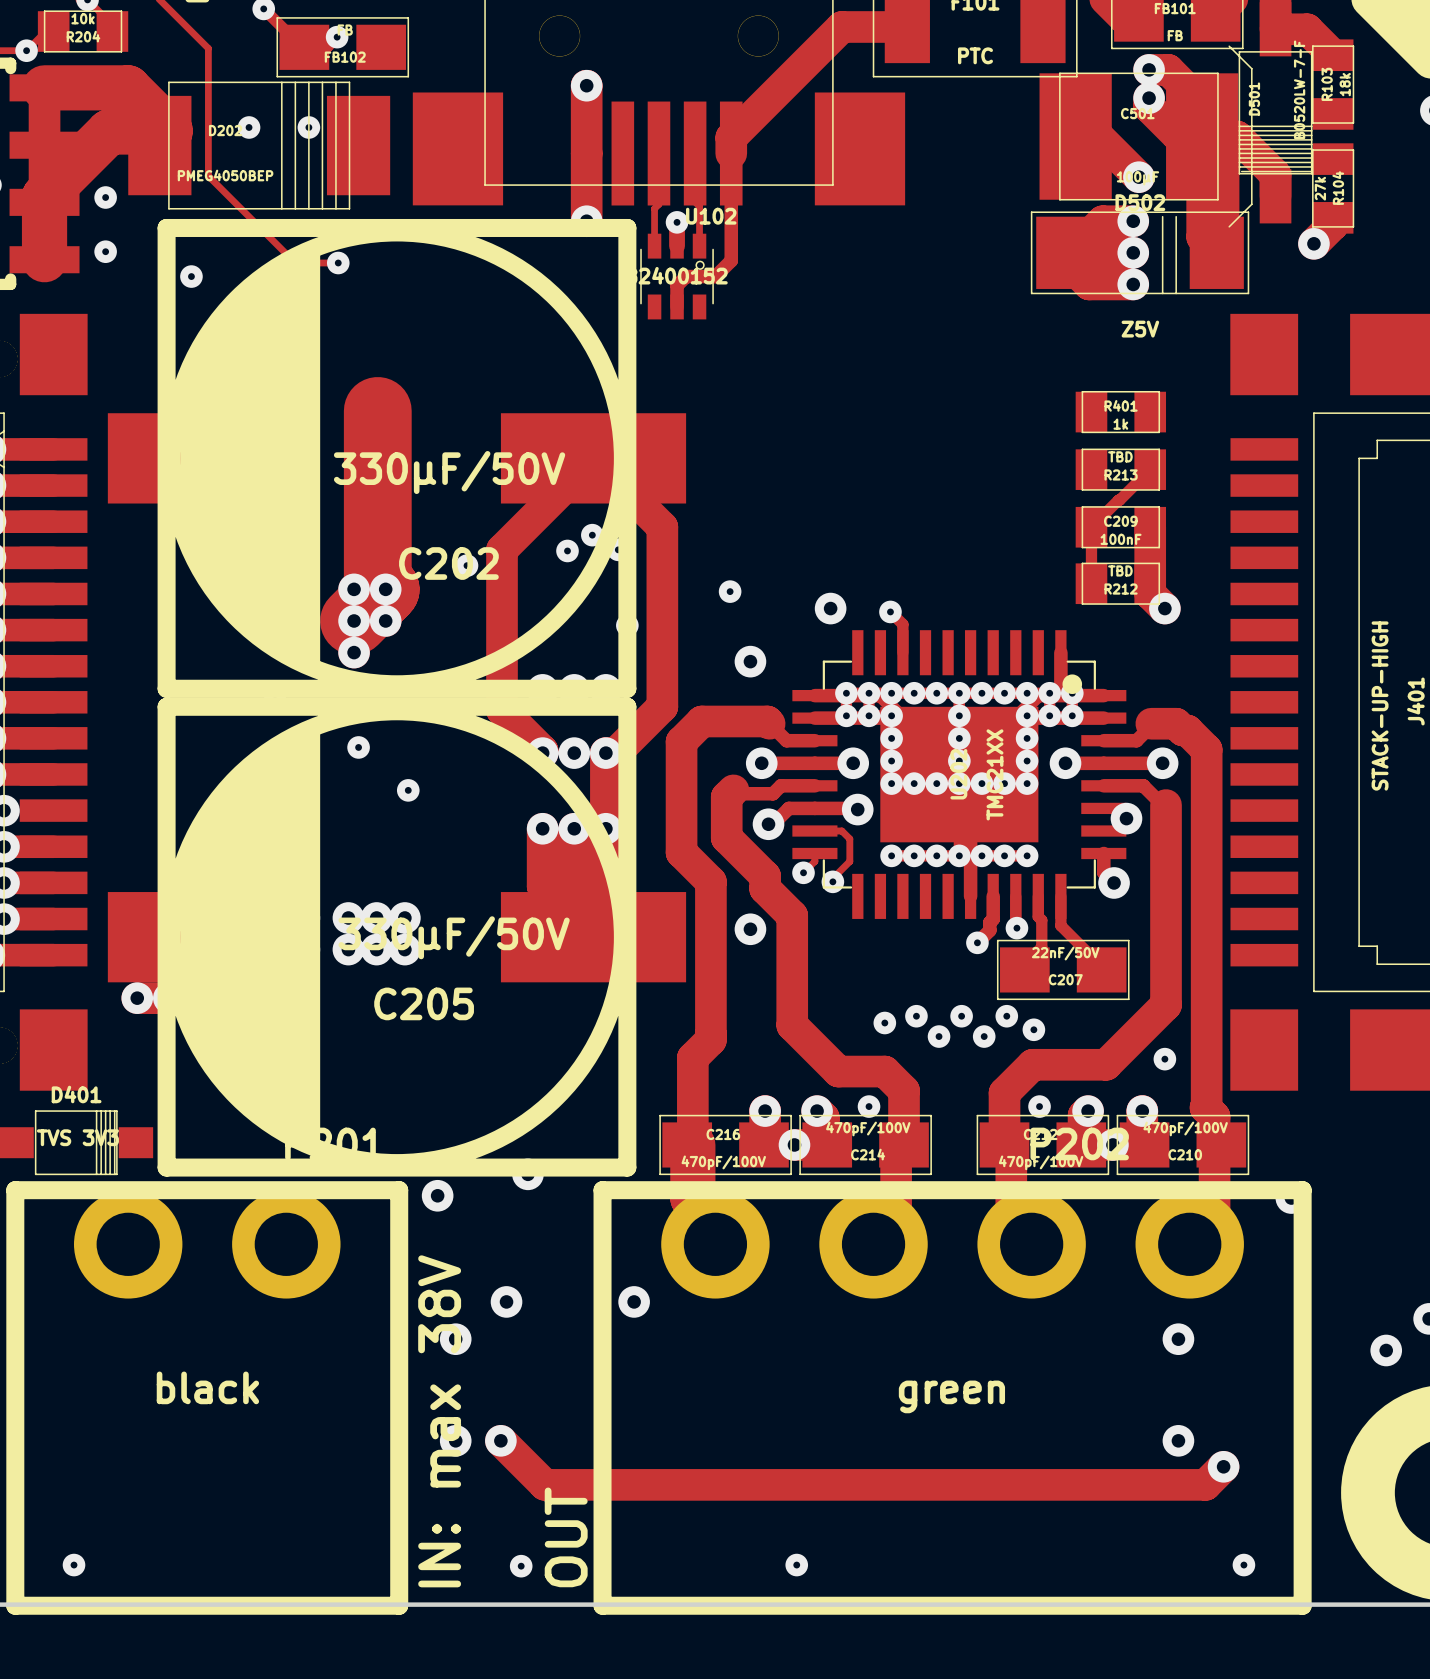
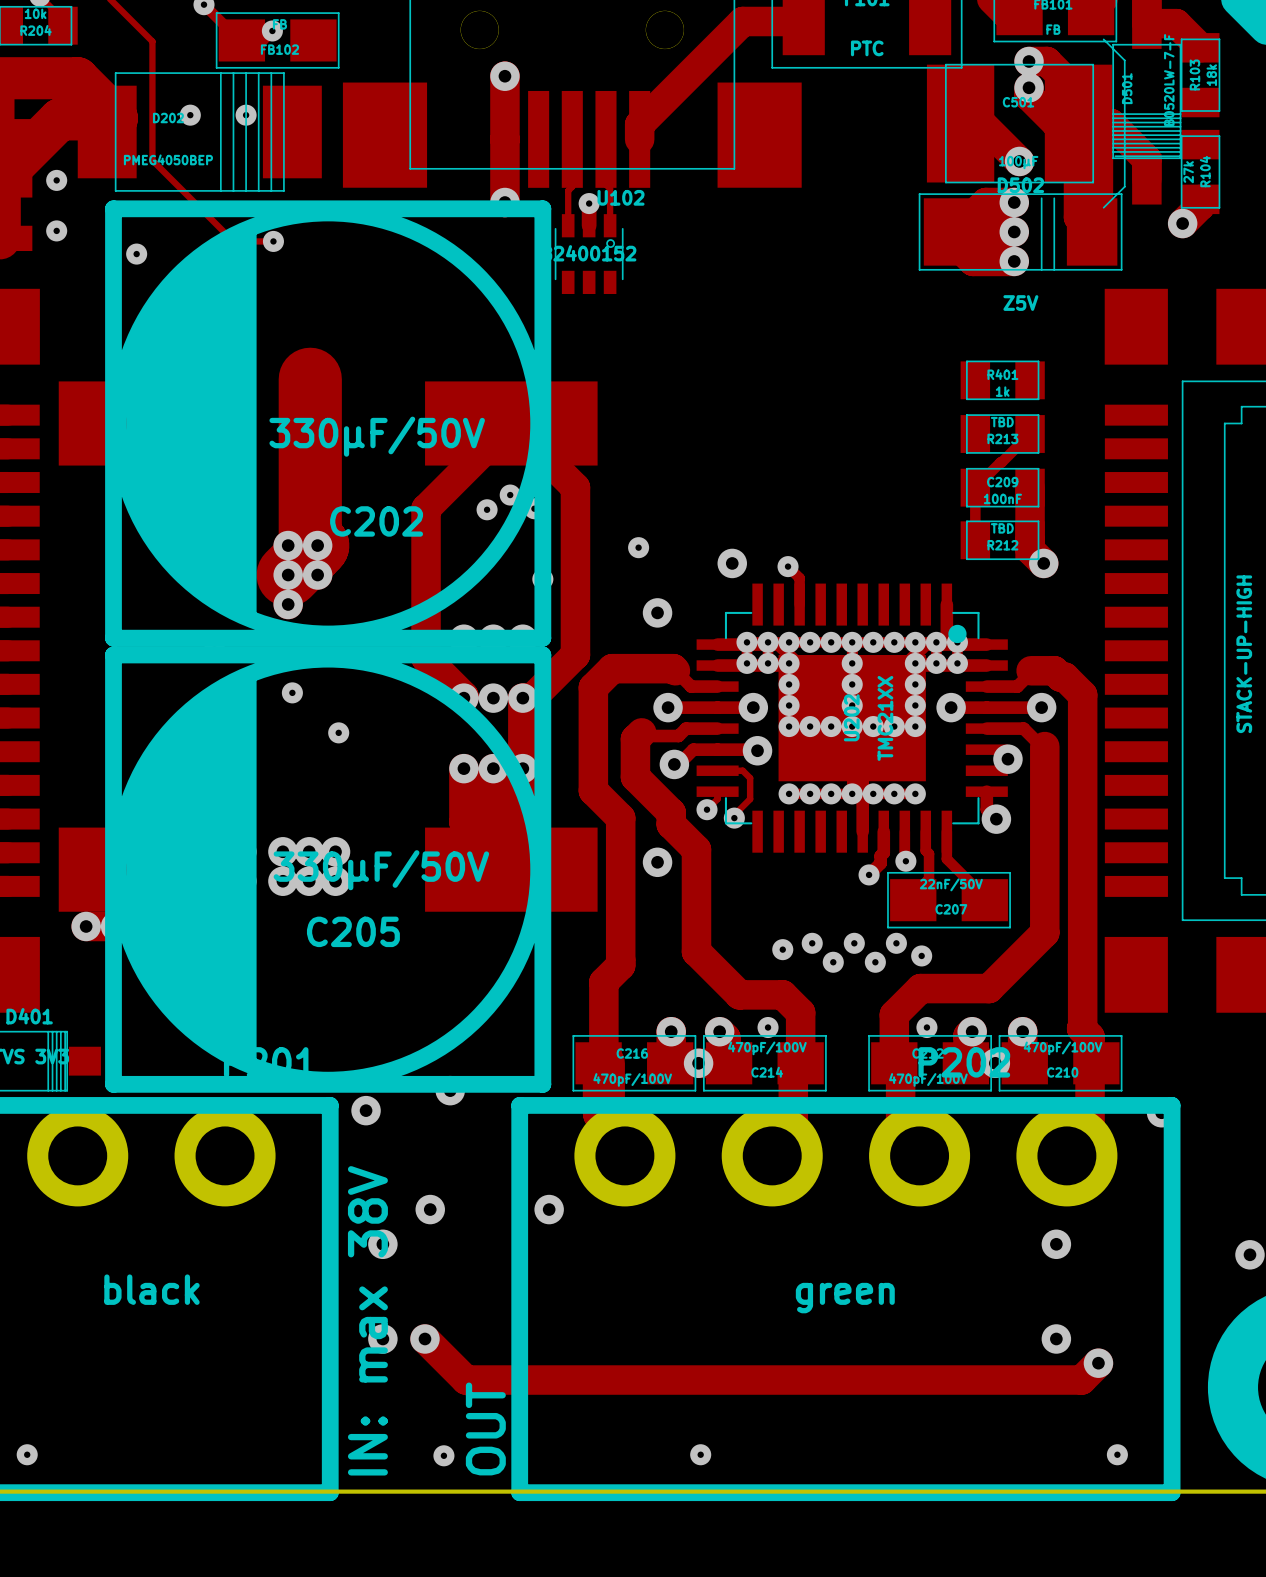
track: (731, 153) (731, 260) (715, 276) (686, 276) (677, 285) (677, 306) -> none
via: (466, 565) -> none
via: (1164, 1059) -> none

